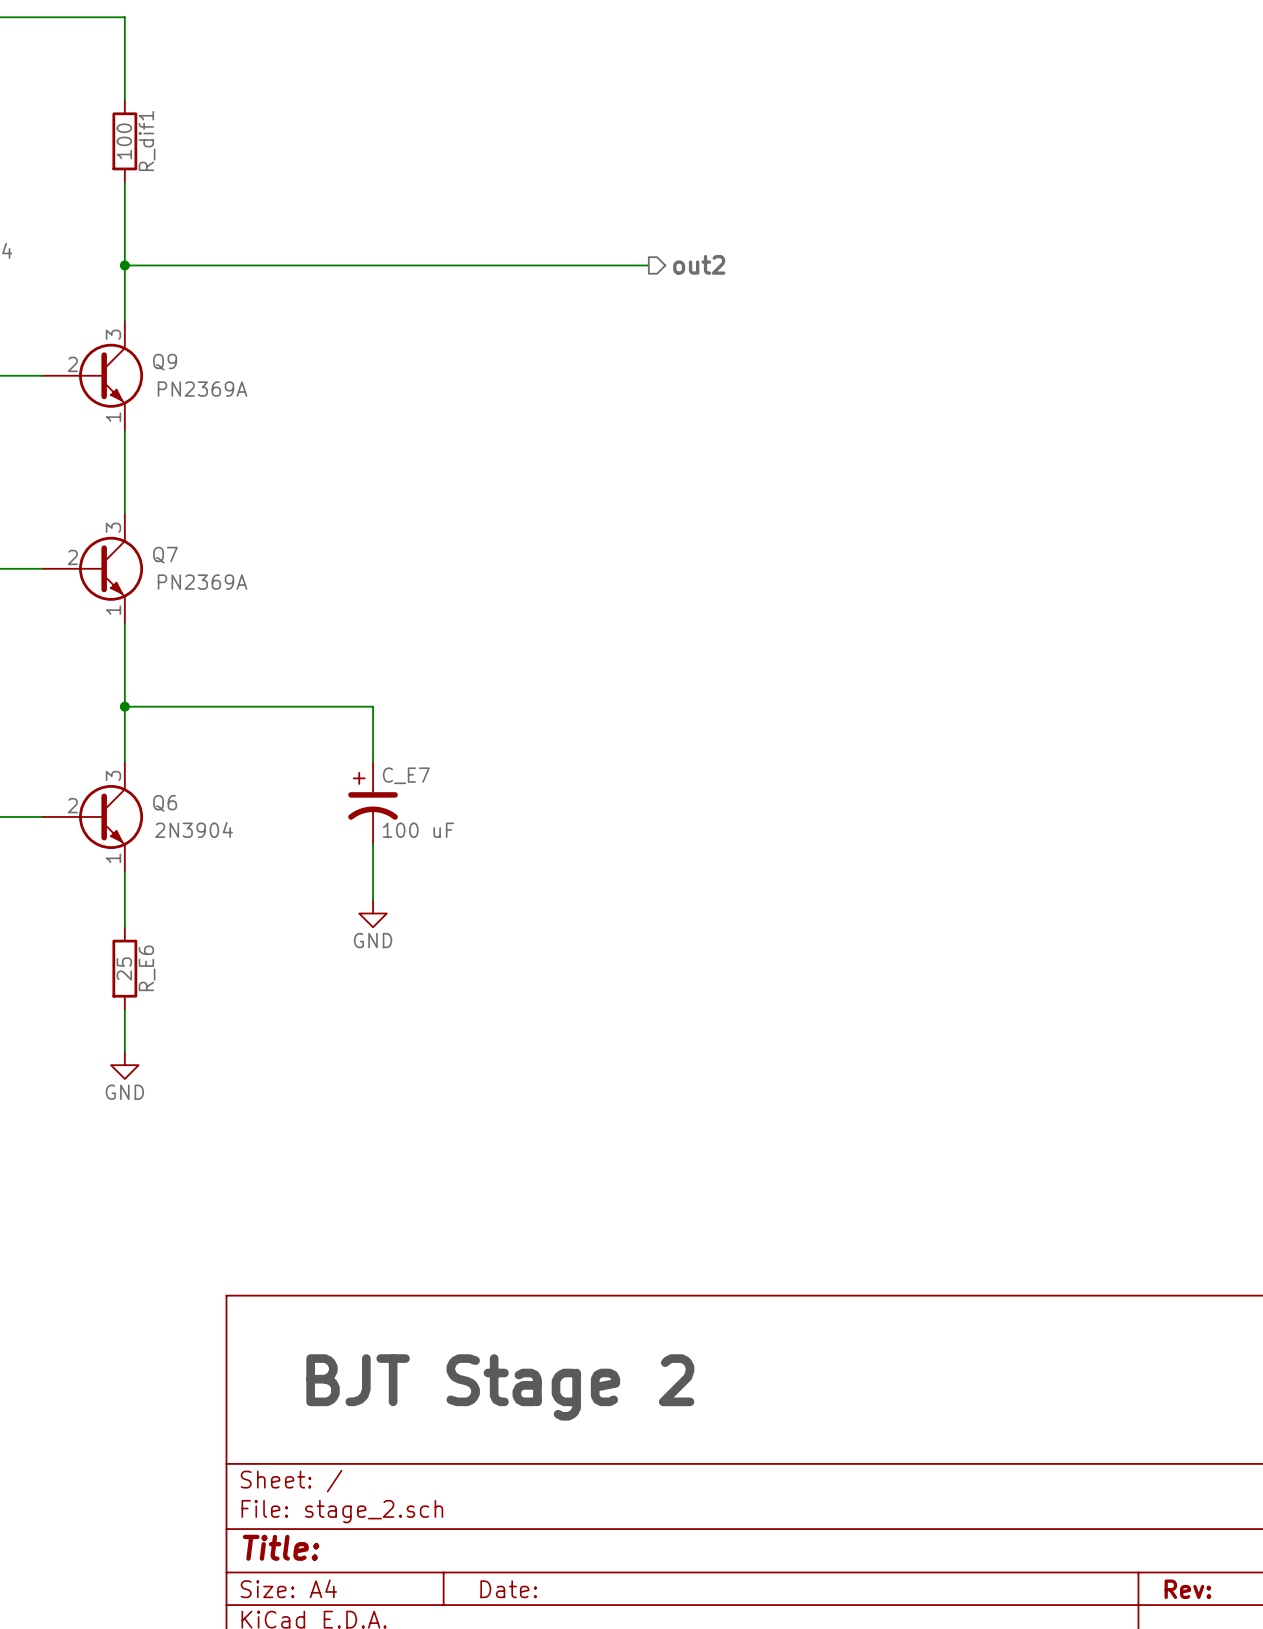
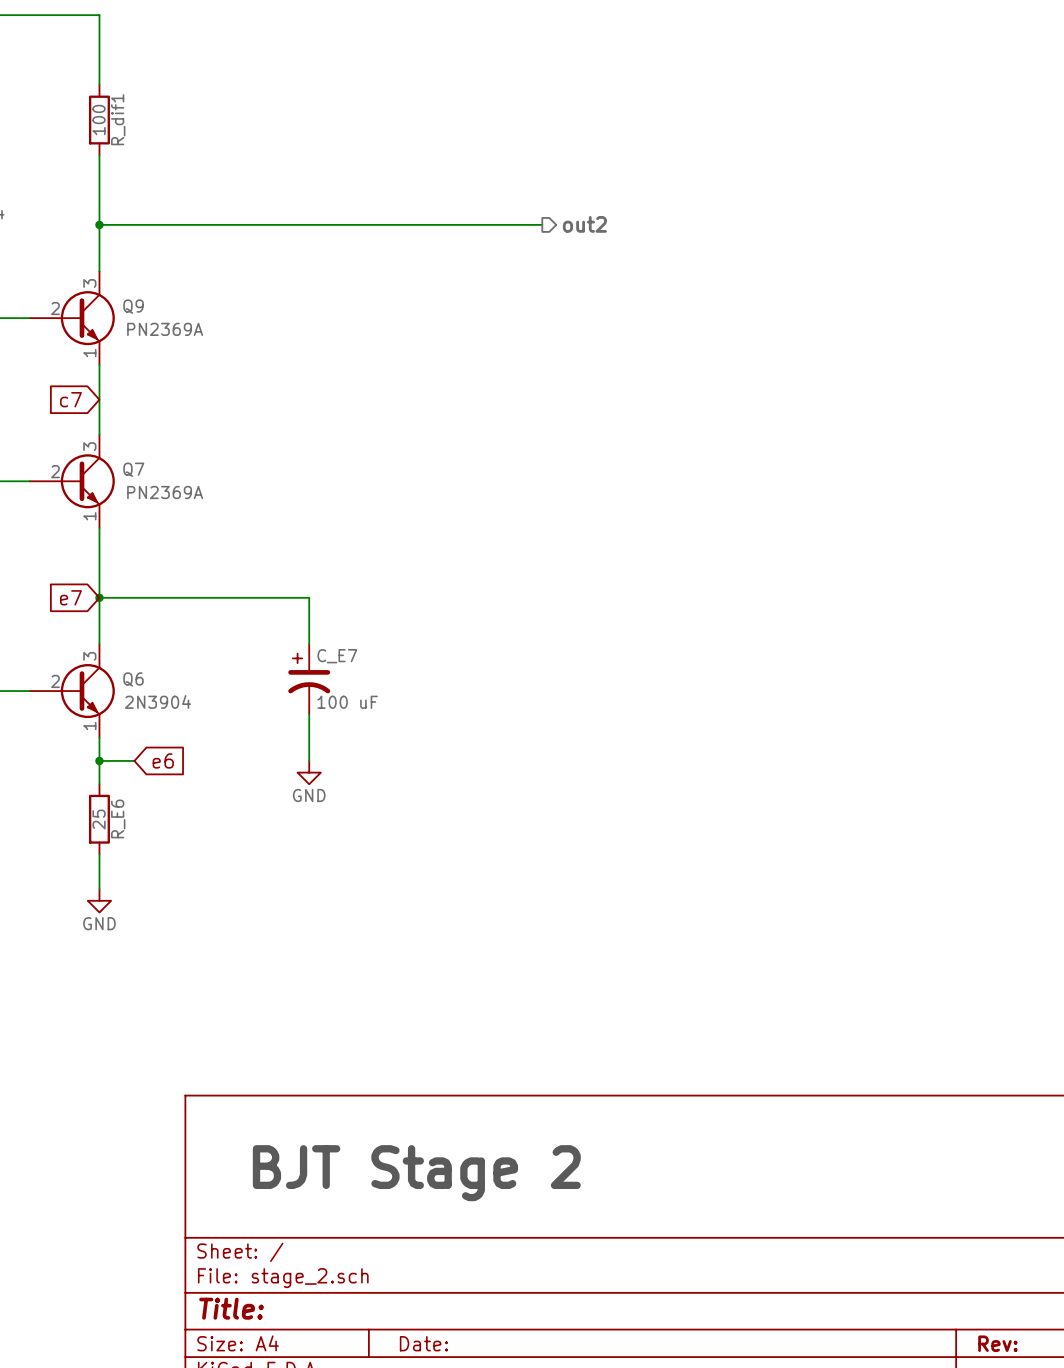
global label: none -> c7 (70, 399)
global label: none -> e7 (70, 597)
wire: none -> (99, 760) (134, 760)
junction: none -> (99, 760)
global label: none -> e6 (163, 760)

